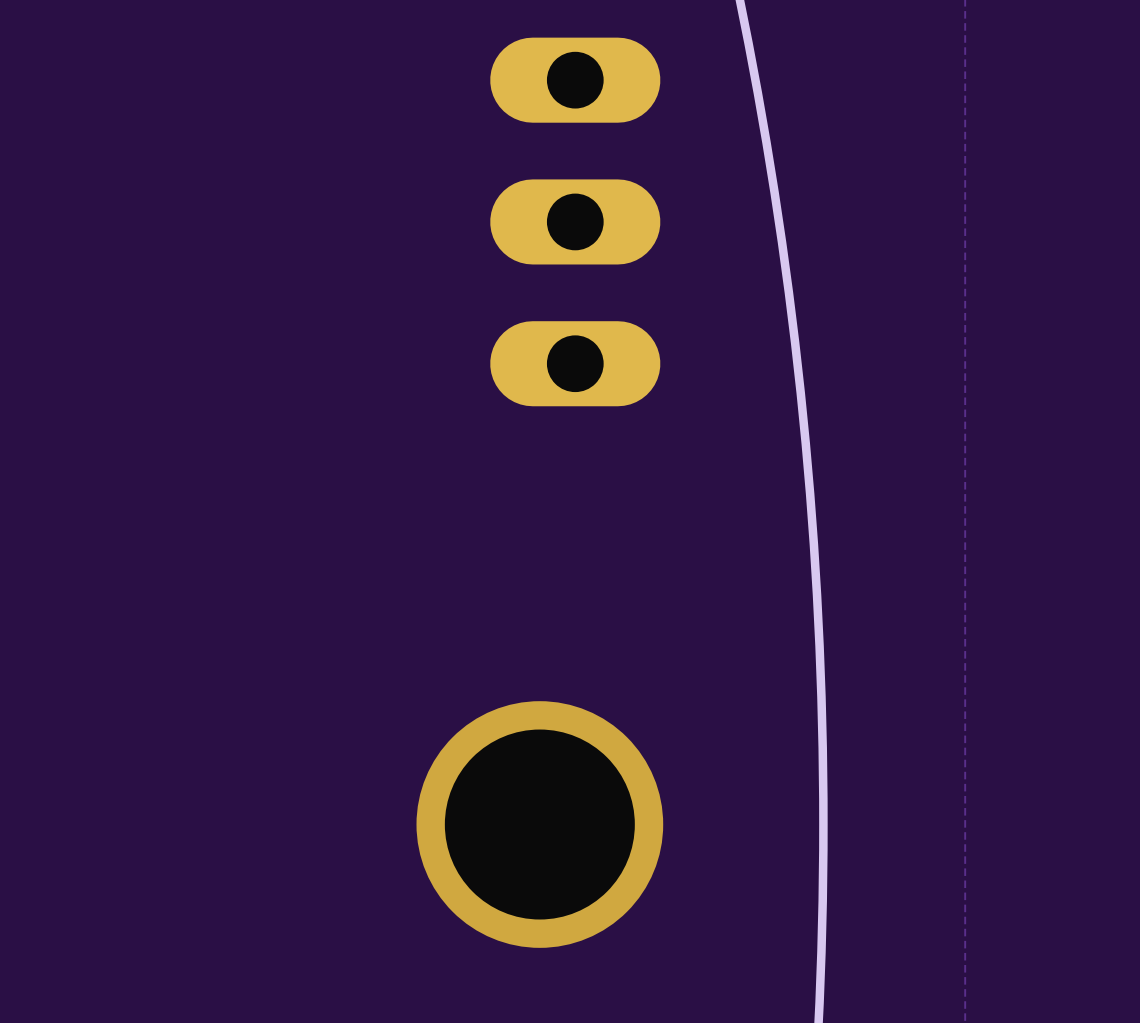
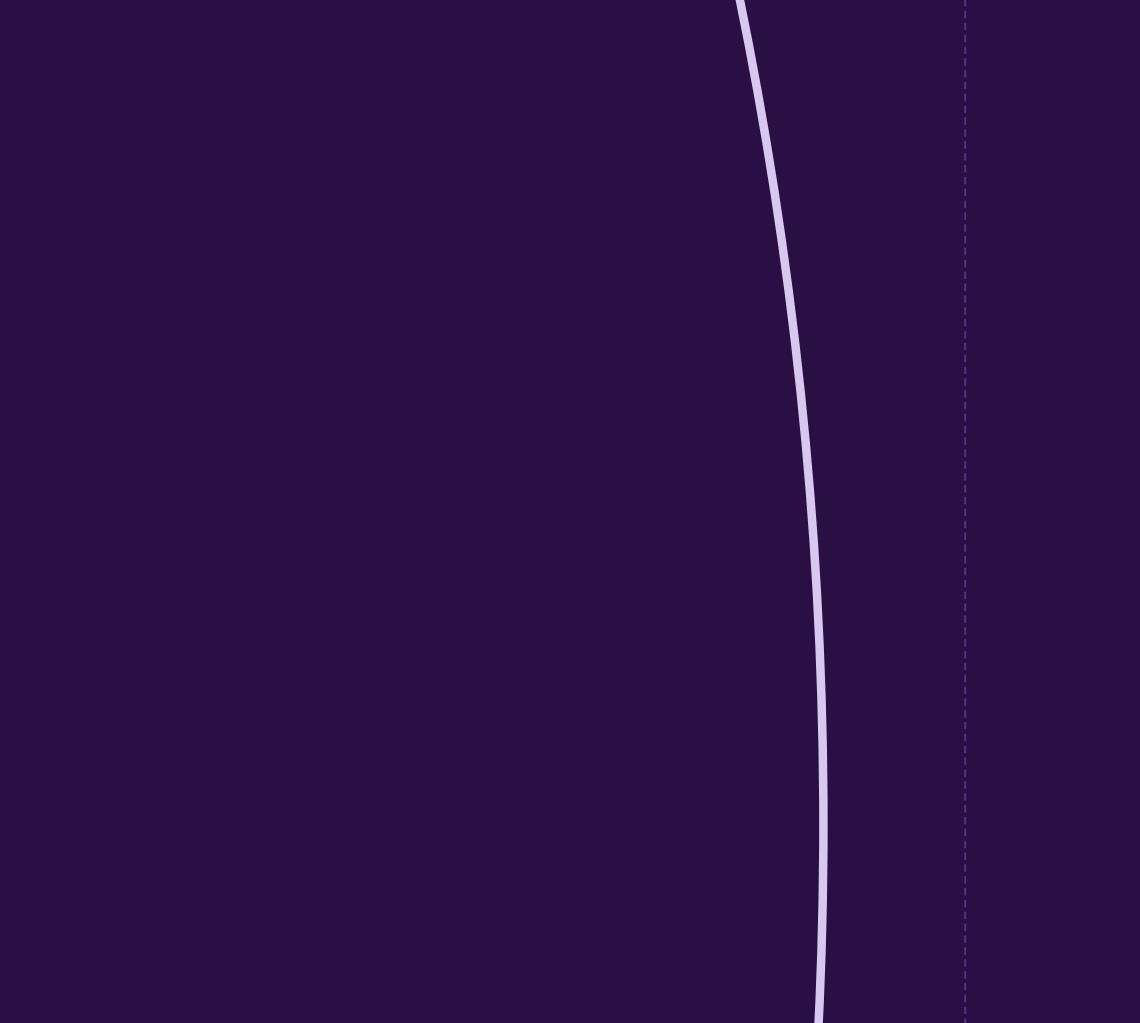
part: (575, 221) -> none
via: (539, 824) -> none

